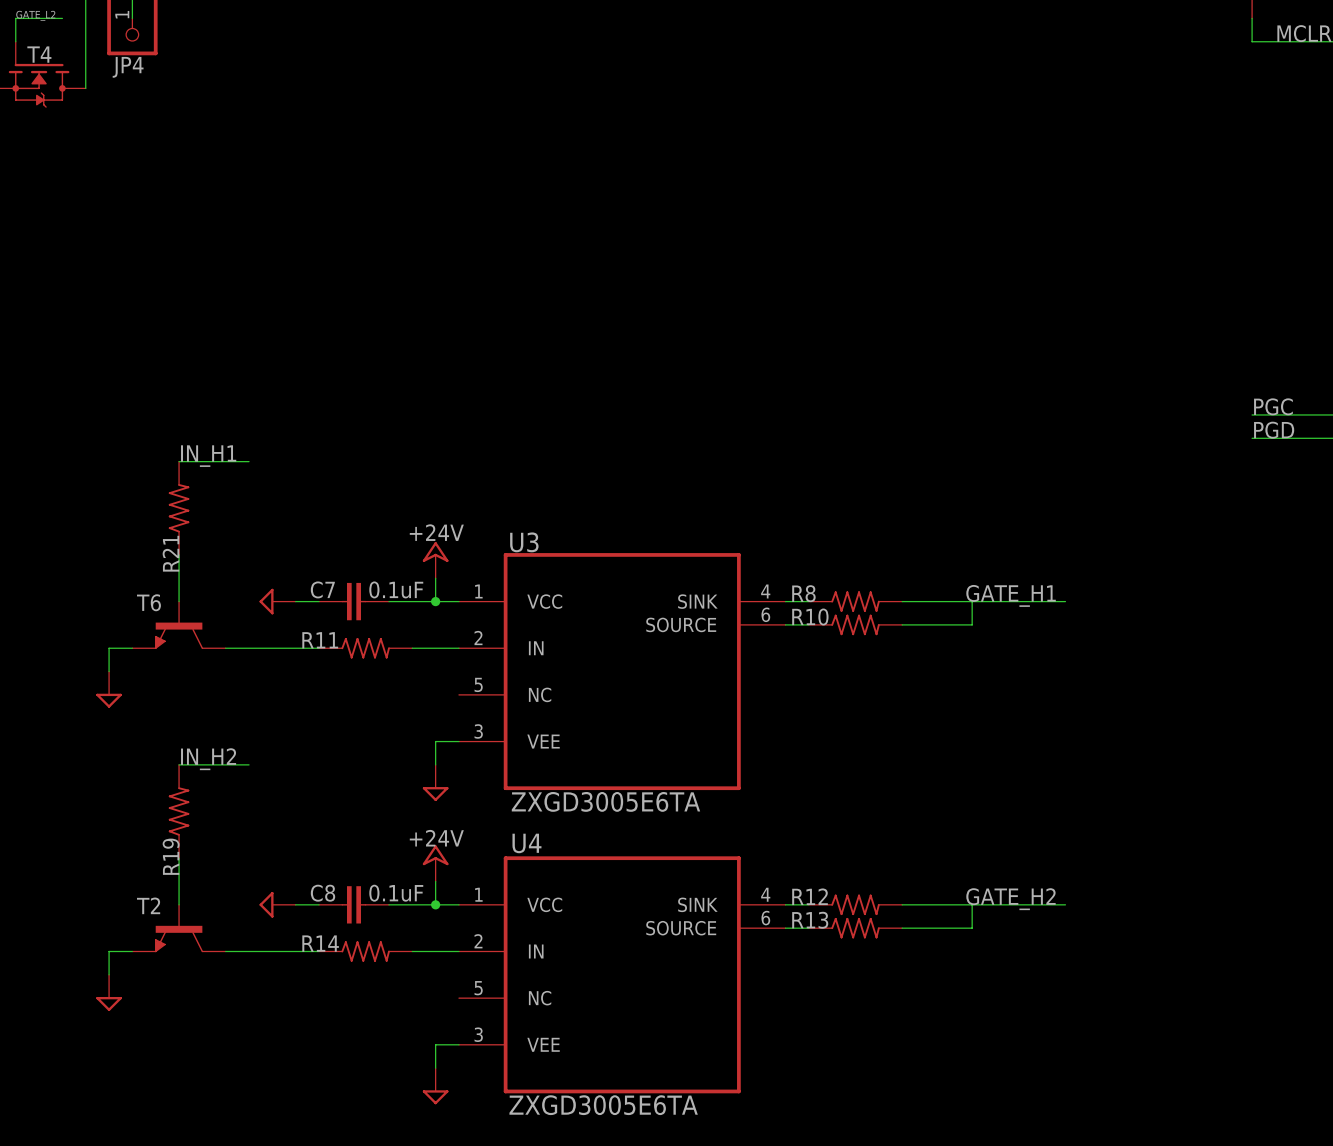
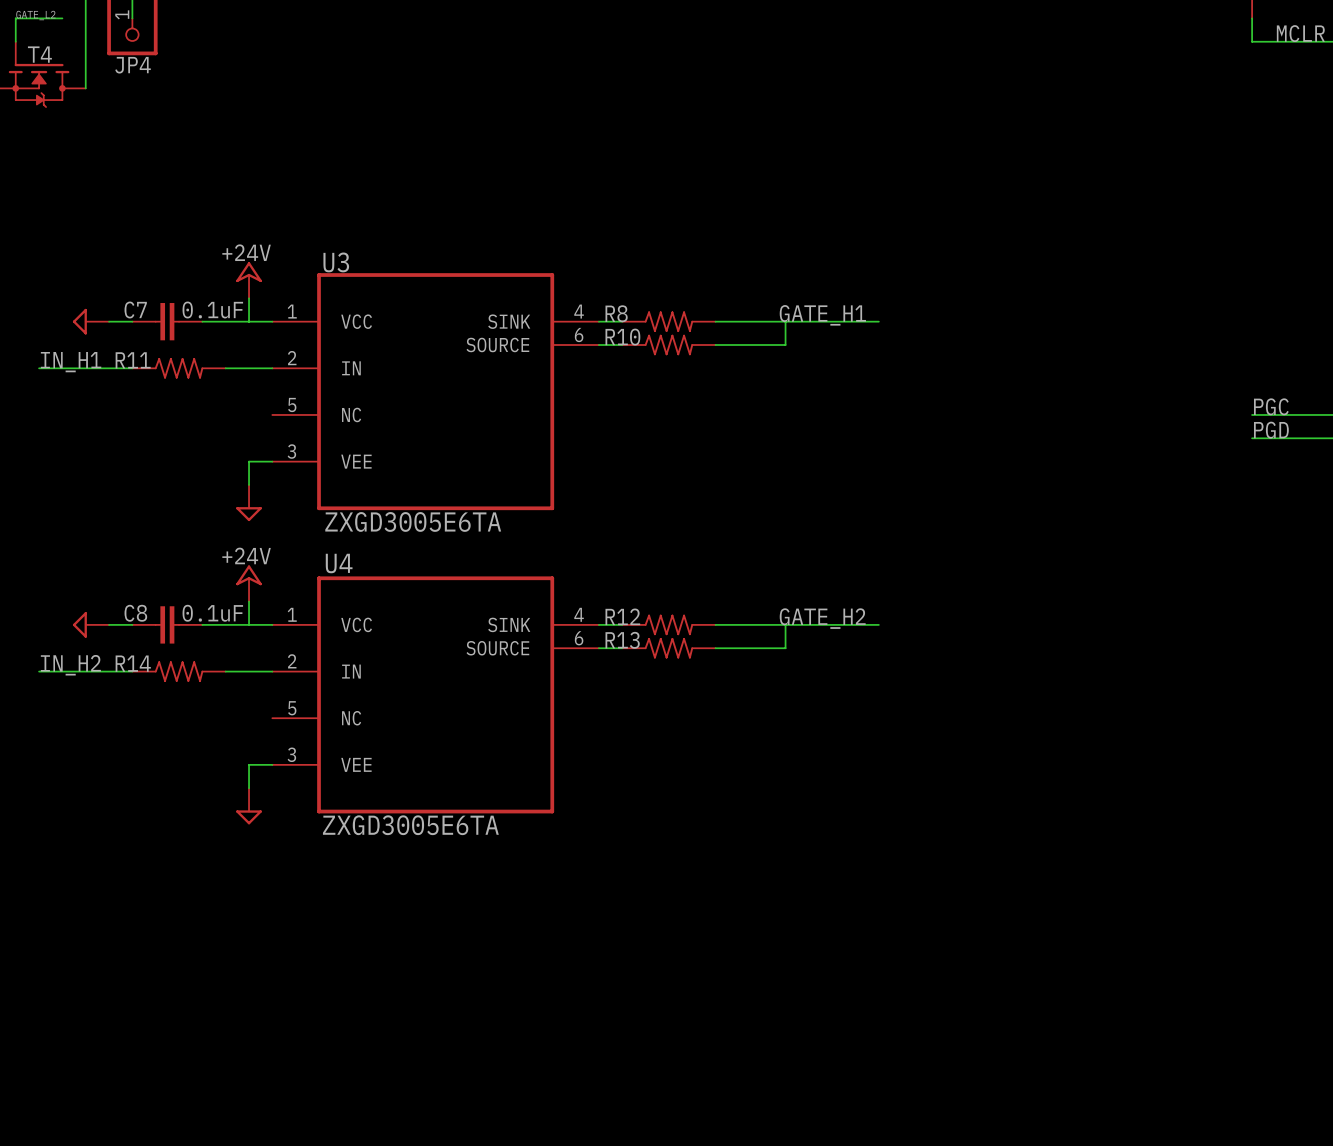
power symbol: none -> +24V (249, 280)
wire: none -> (249, 298) (249, 321)
label: none -> GATE_H1 (822, 315)
power symbol: none -> (90, 321)
wire: none -> (109, 321) (132, 321)
wire: none -> (598, 321) (622, 321)
wire: none -> (715, 321) (878, 321)
wire: none -> (785, 321) (785, 344) (715, 344)
wire: none -> (598, 344) (622, 344)
wire: none -> (39, 368) (132, 368)
wire: none -> (225, 368) (272, 368)
label position: IN_H1 (208, 456) -> IN_H1 (71, 362)
wire: (179, 461) (249, 461) -> (202, 321) (272, 321)
wire: none -> (272, 461) (249, 461) (249, 484)
power symbol: none -> (249, 503)
R21: (179, 508) -> none
wire: (179, 554) (179, 601) -> none
power symbol: +24V (435, 560) -> none
wire: (435, 578) (435, 601) -> (249, 601) (249, 624)
power symbol: none -> +24V (249, 583)
label: GATE_H1 (1011, 595) -> none
power symbol: (277, 601) -> none
wire: (295, 601) (319, 601) -> (109, 624) (132, 624)
C7 position: (353, 601) -> (167, 321)
wire: (388, 601) (458, 601) -> (202, 624) (272, 624)
junction: (435, 601) -> none
wire: (785, 601) (808, 601) -> (598, 624) (622, 624)
R8 position: (855, 601) -> (668, 321)
wire: (902, 601) (1065, 601) -> none
wire: (972, 601) (972, 624) (902, 624) -> none
label: none -> GATE_H2 (822, 618)
wire: none -> (715, 624) (785, 624) (785, 648) (715, 648)
R10 position: (855, 624) -> (668, 344)
T6: (179, 625) -> none
wire: (132, 648) (109, 648) (109, 671) -> none
wire: (225, 648) (319, 648) -> (39, 671) (132, 671)
R11 position: (365, 648) -> (179, 368)
wire: (412, 648) (458, 648) -> (225, 671) (272, 671)
wire: none -> (598, 648) (622, 648)
U3 position: (622, 671) -> (435, 391)
power symbol position: (109, 689) -> (90, 624)
power symbol rotation: 0° (109, 700) -> 90° clockwise (79, 624)
wire: (458, 741) (435, 741) (435, 764) -> (272, 764) (249, 764) (249, 788)
label position: IN_H2 (208, 759) -> IN_H2 (70, 665)
wire: (179, 764) (249, 764) -> none
power symbol: (435, 782) -> none
power symbol: none -> (249, 806)
R19: (179, 811) -> none
wire: (179, 858) (179, 904) -> none
power symbol: +24V (435, 863) -> none
wire: (435, 881) (435, 904) -> none
label: GATE_H2 (1010, 899) -> none
power symbol: (277, 904) -> none
wire: (295, 904) (319, 904) -> none
C8 position: (353, 904) -> (167, 624)
wire: (388, 904) (458, 904) -> none
junction: (435, 904) -> none
wire: (785, 904) (808, 904) -> none
R12 position: (855, 904) -> (668, 624)
wire: (902, 904) (1065, 904) -> none
wire: (972, 904) (972, 928) (902, 928) -> none
T2: (179, 928) -> none
wire: (785, 928) (808, 928) -> none
R13 position: (855, 928) -> (668, 648)
wire: (132, 951) (109, 951) (109, 974) -> none
wire: (225, 951) (319, 951) -> none
R14 position: (365, 951) -> (179, 671)
wire: (412, 951) (458, 951) -> none
U4 position: (622, 974) -> (435, 694)
power symbol: (109, 992) -> none
wire: (458, 1044) (435, 1044) (435, 1068) -> none
power symbol: (435, 1086) -> none

